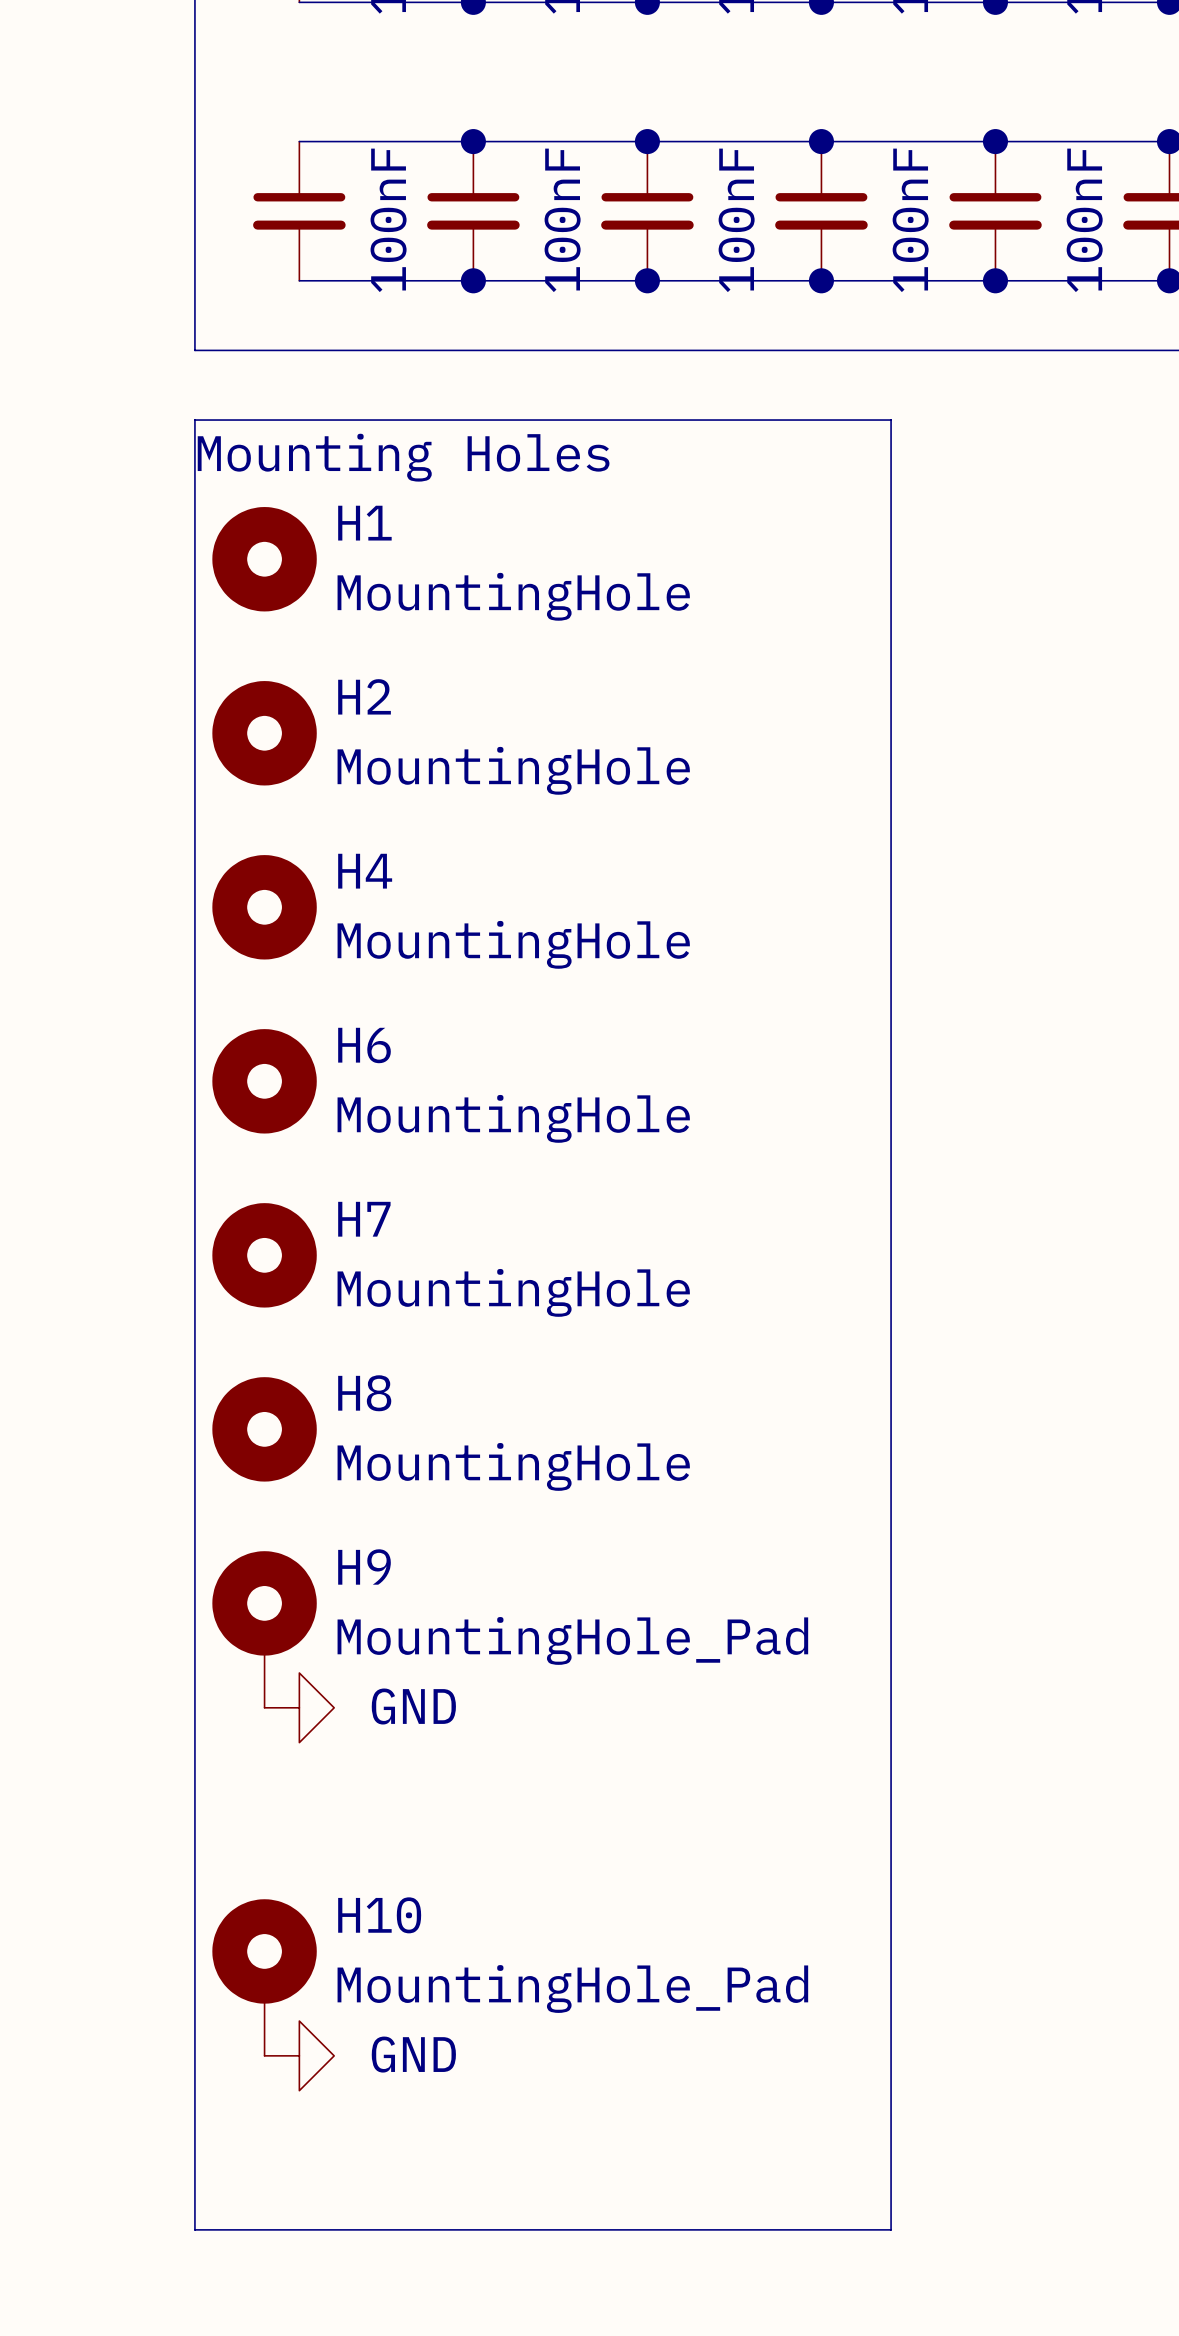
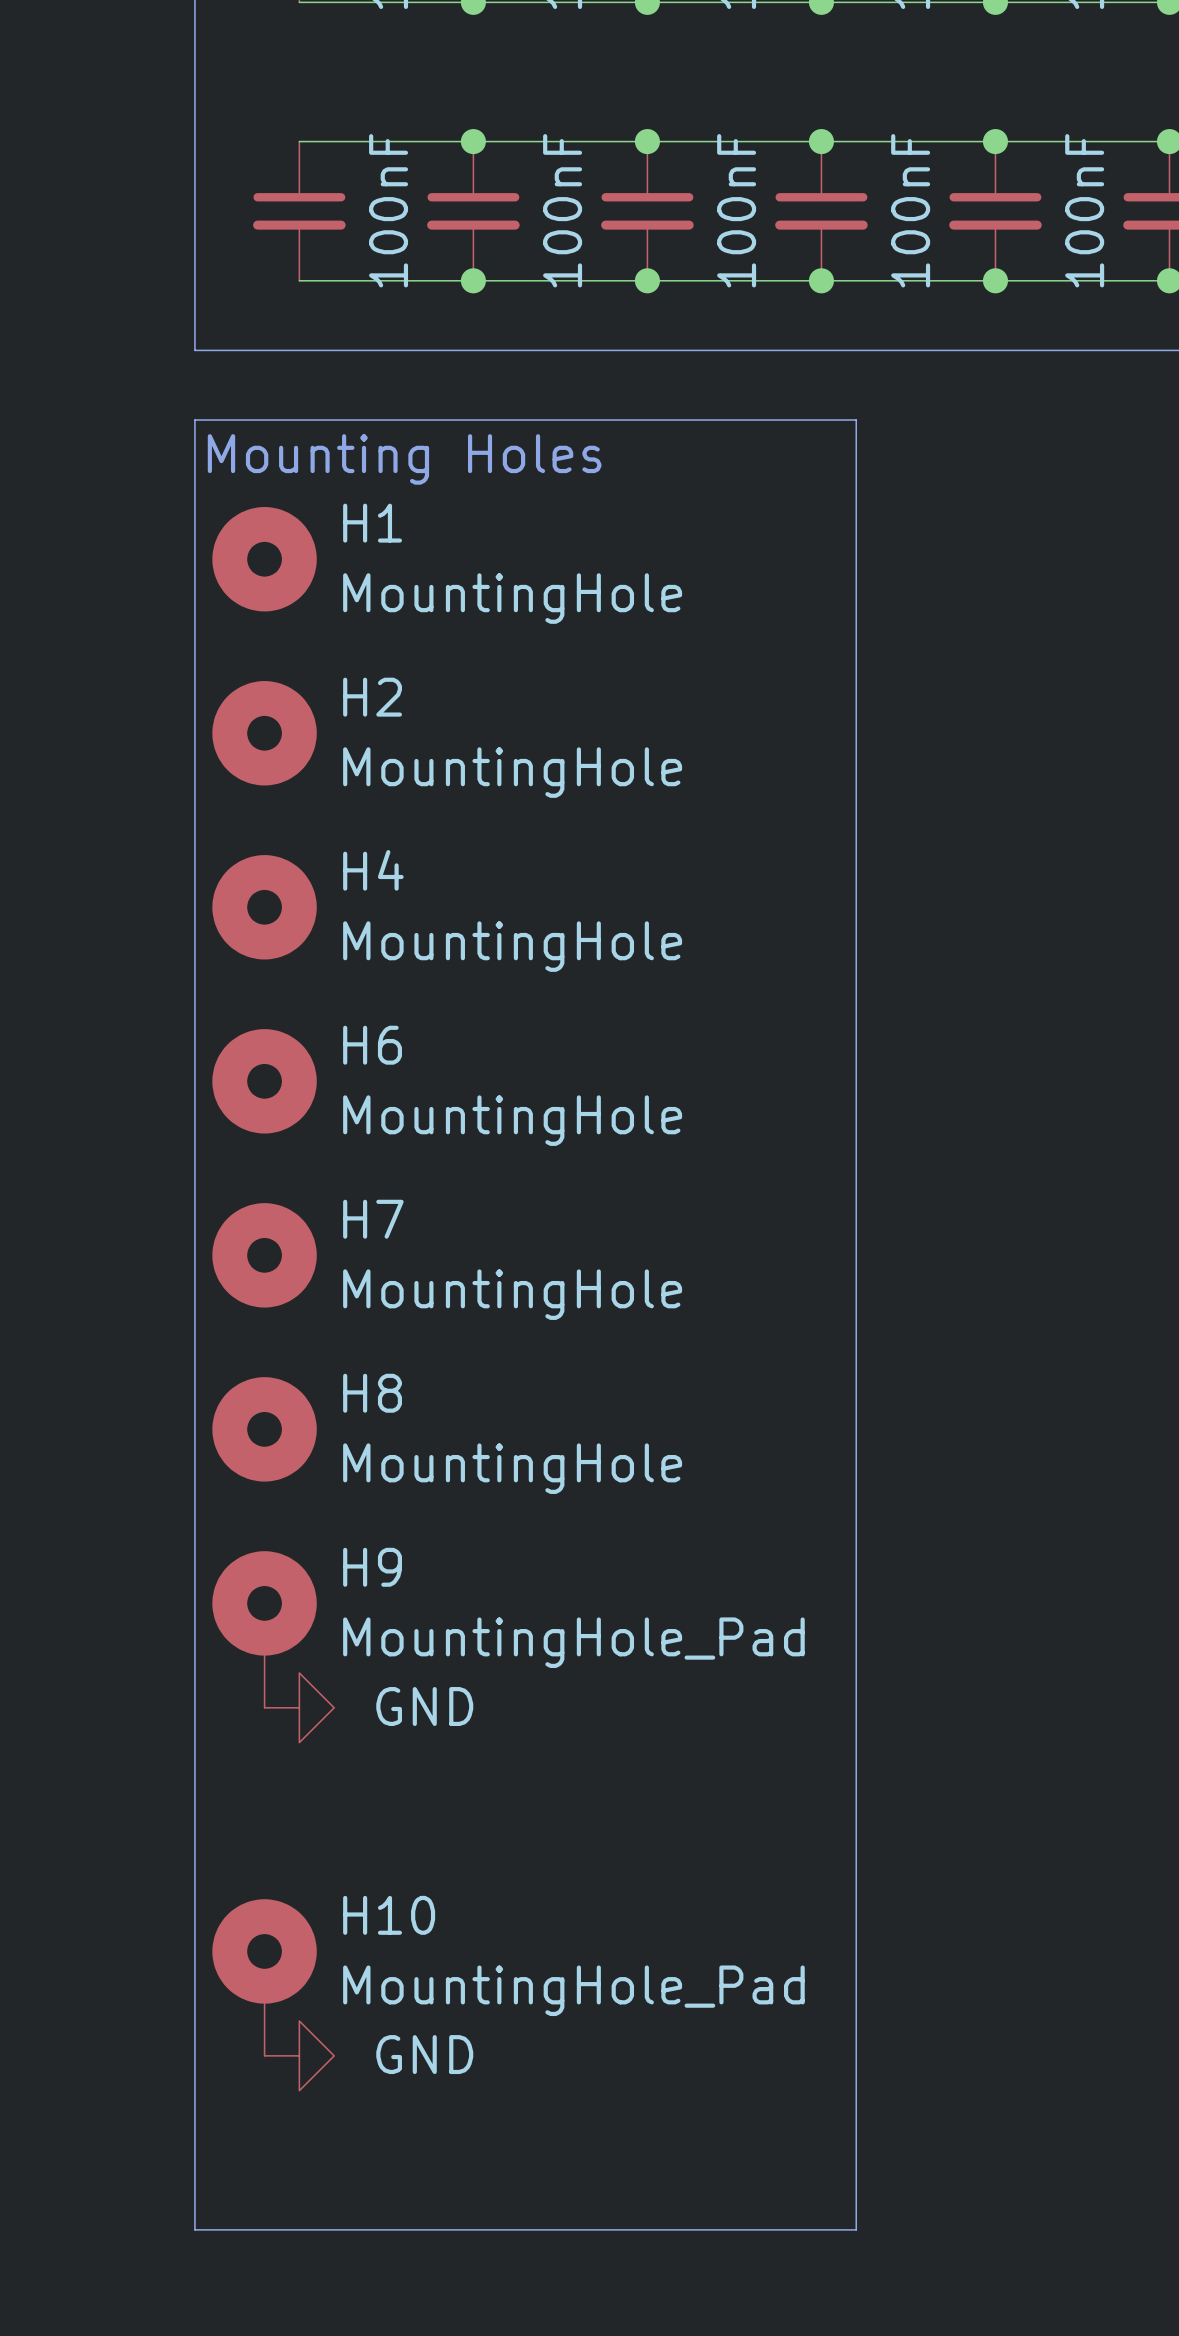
line: (856, 420) (891, 420) (891, 2229) (856, 2229) -> (856, 420) (856, 2229)

